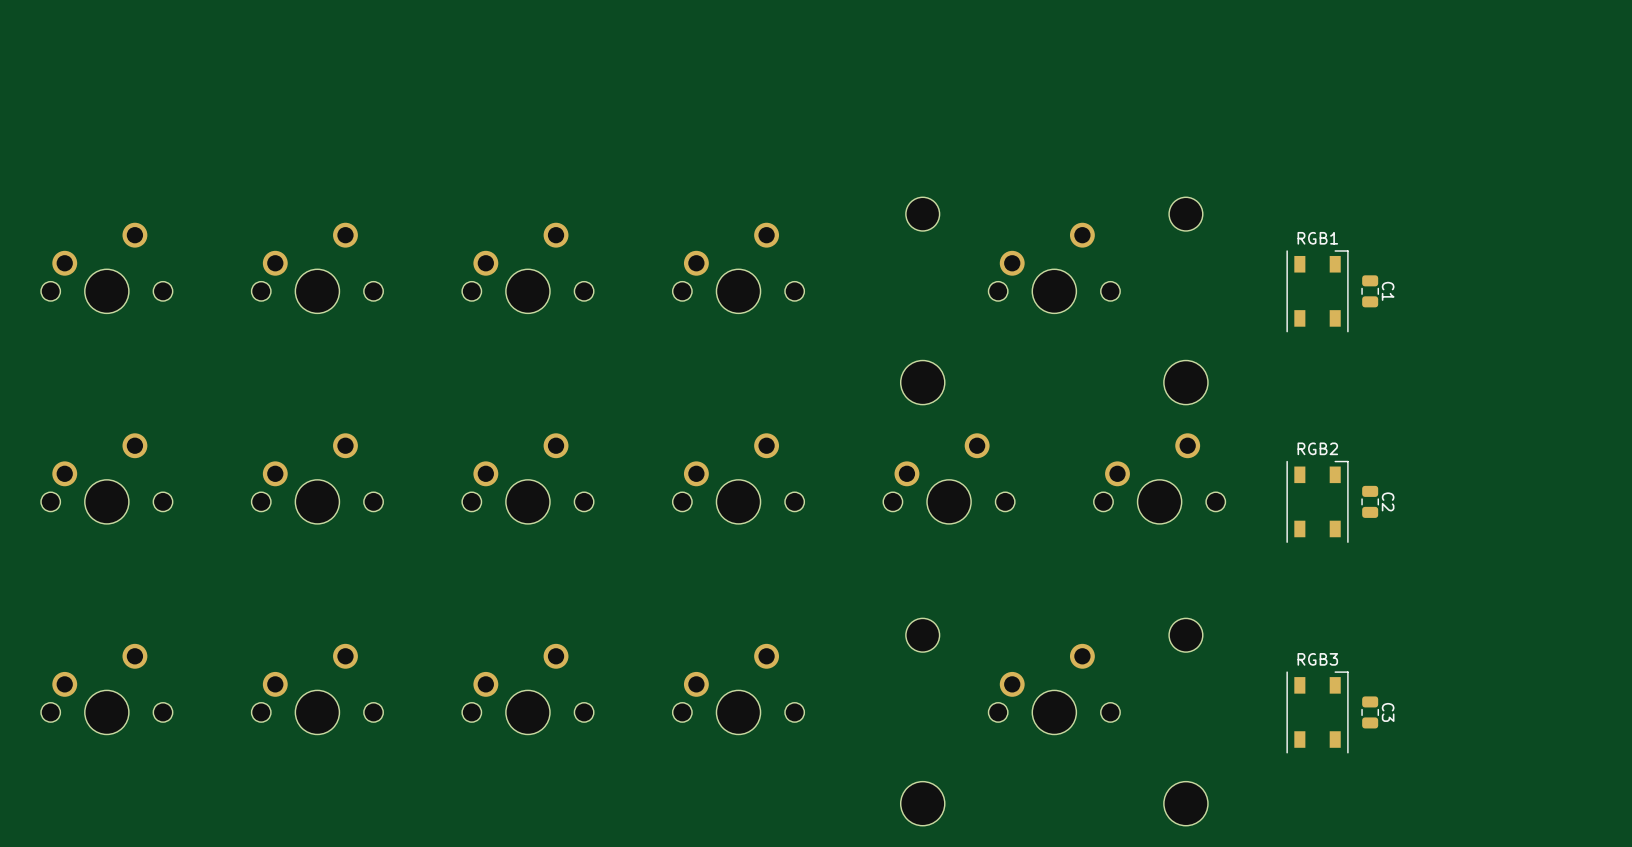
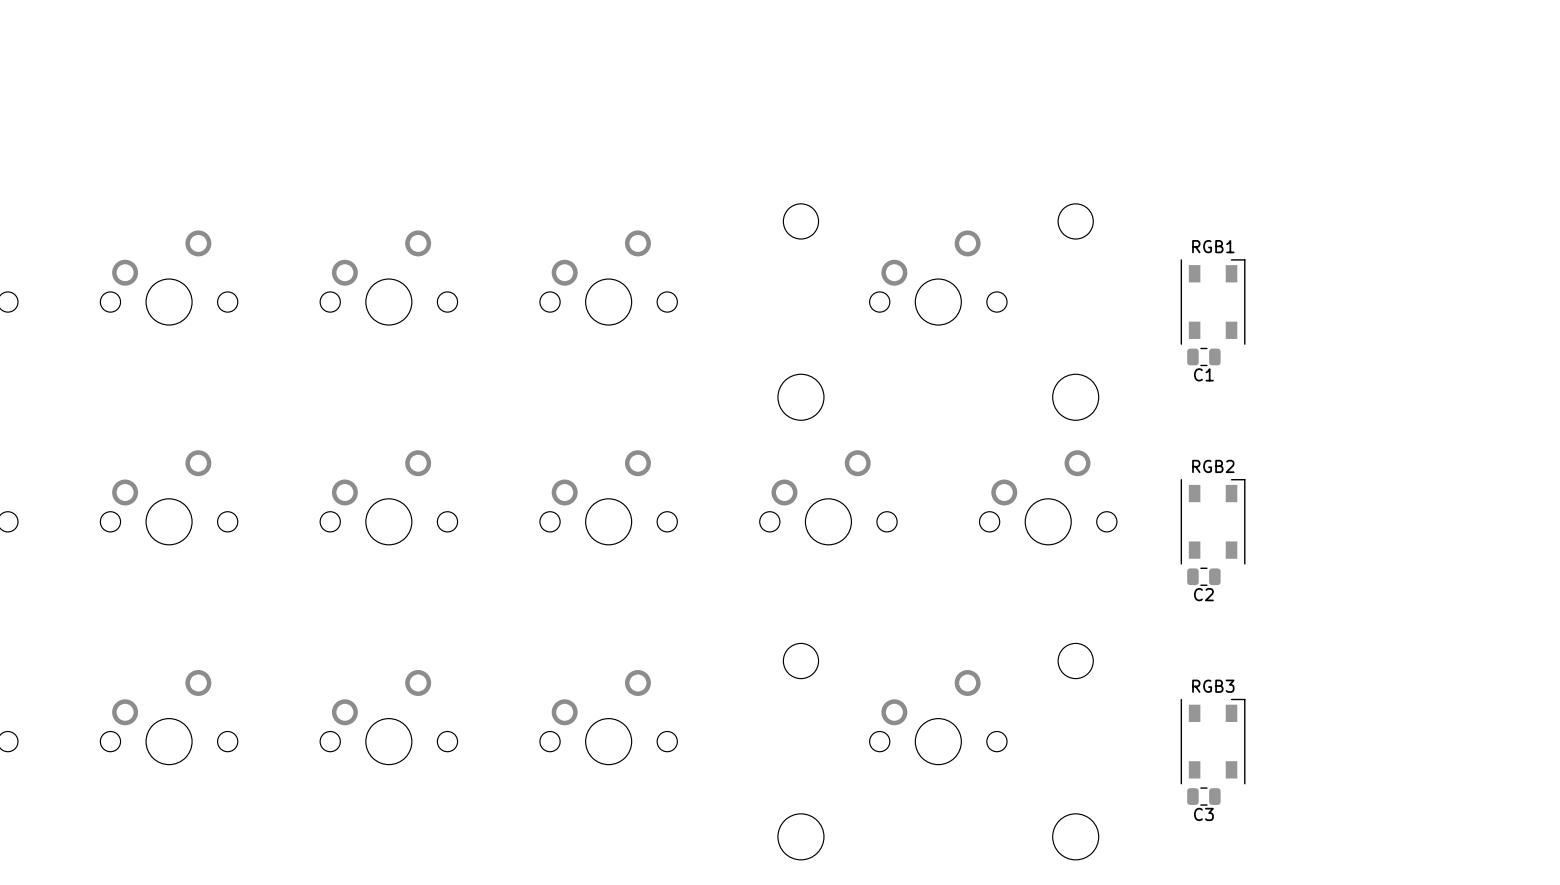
C1 rotation: 0° (1370, 291) -> 90° clockwise (1203, 356)
C1 position: (1370, 291) -> (1203, 356)
C2 rotation: 0° (1370, 501) -> 90° clockwise (1203, 576)
C2 position: (1370, 501) -> (1203, 576)
C3 rotation: 0° (1370, 712) -> 90° clockwise (1203, 796)
C3 position: (1370, 712) -> (1203, 796)

